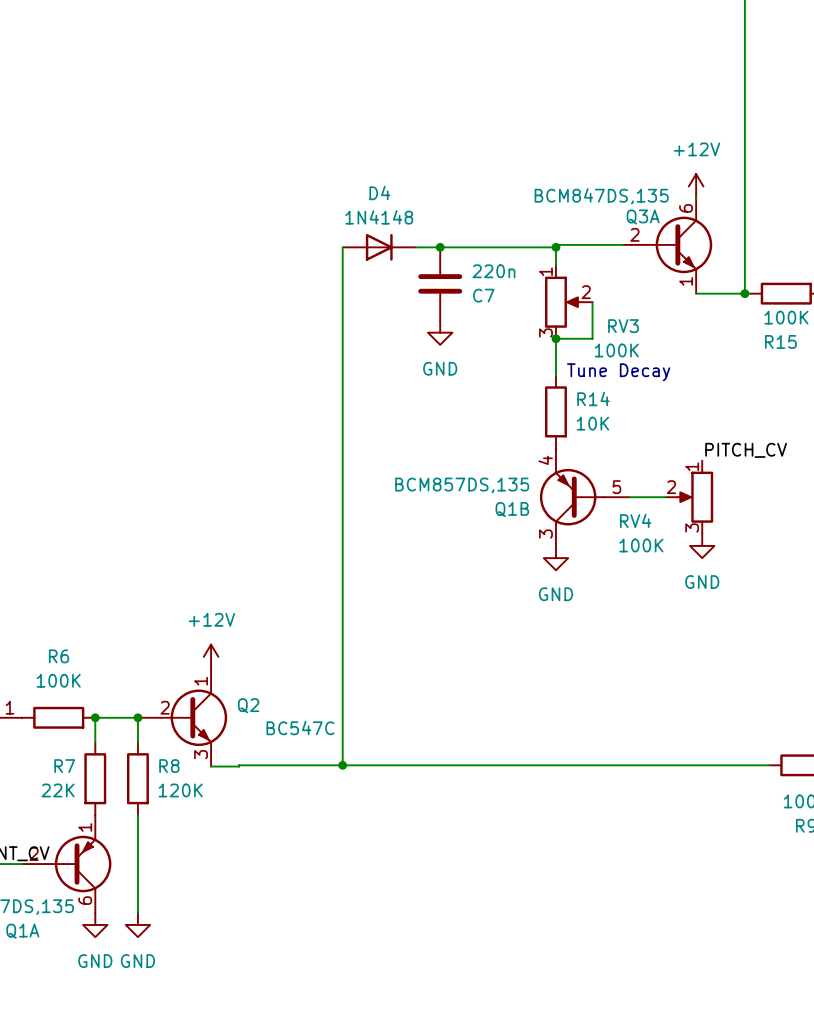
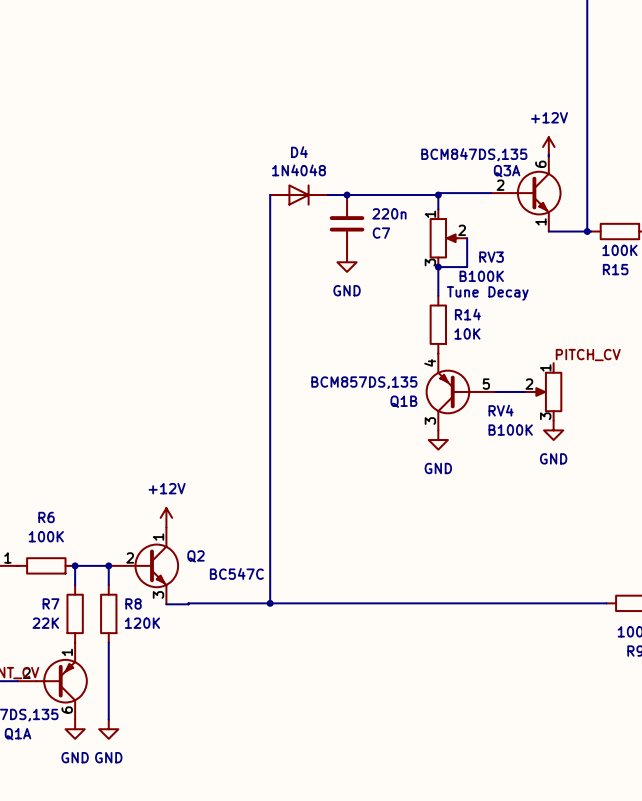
D4 value: 1N4148 (379, 217) -> 1N4048 (299, 170)
RV3 value: 100K (616, 350) -> B100K (481, 276)
RV4 value: 100K (641, 545) -> B100K (510, 430)

